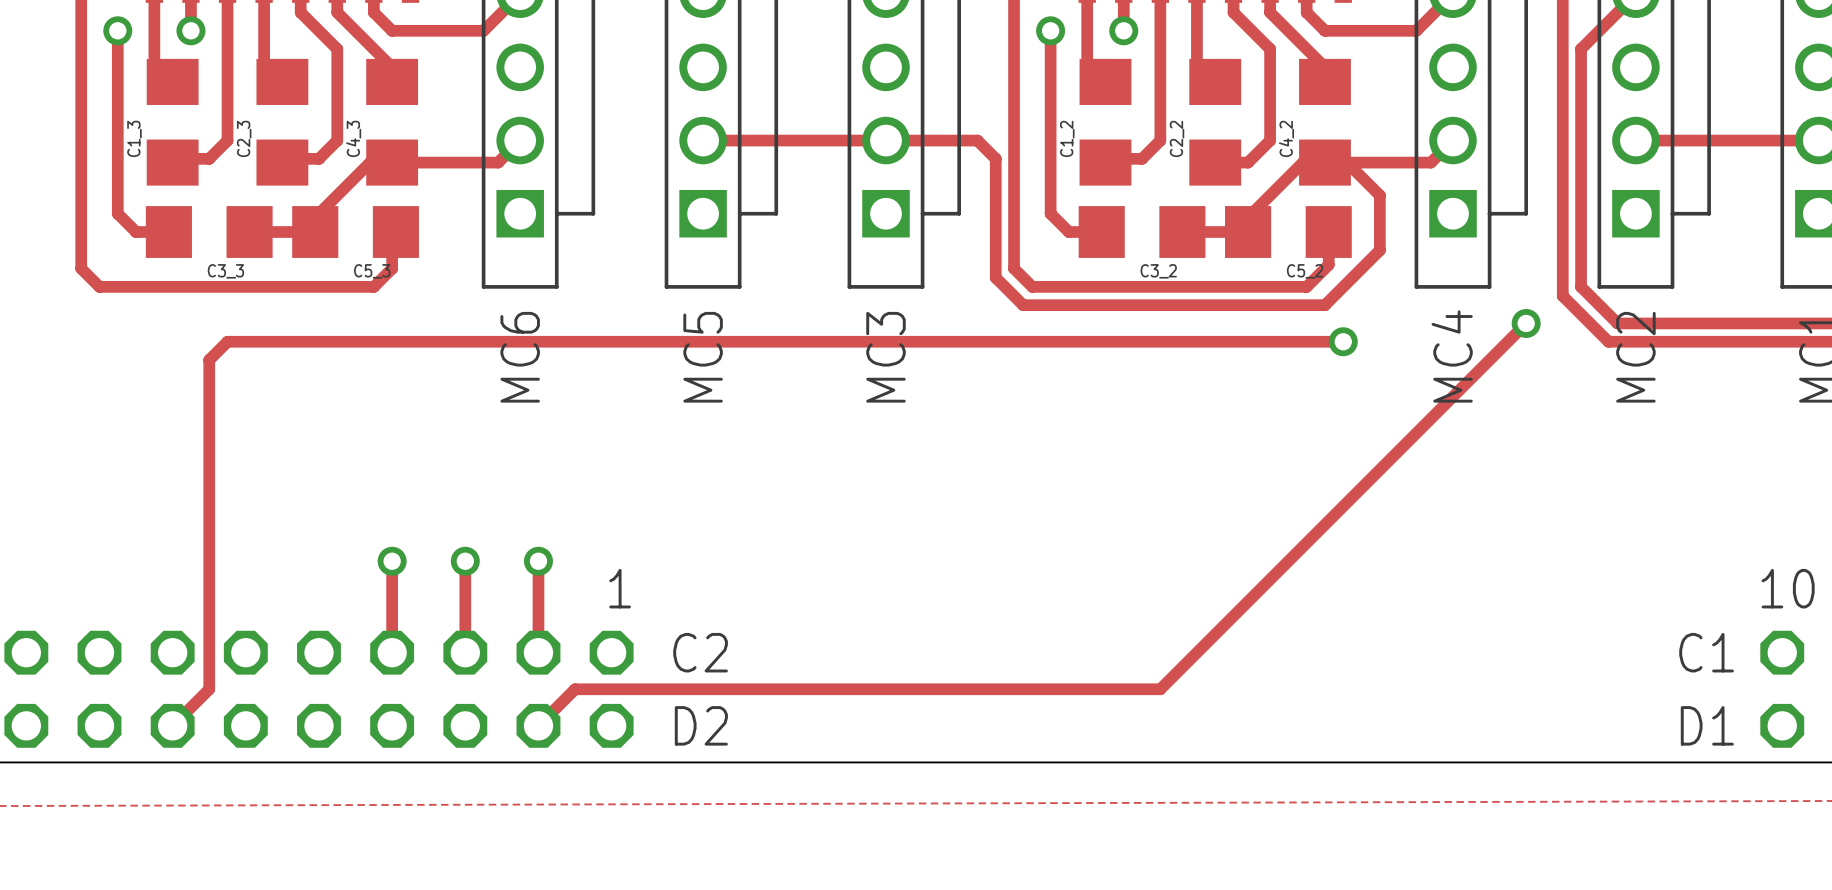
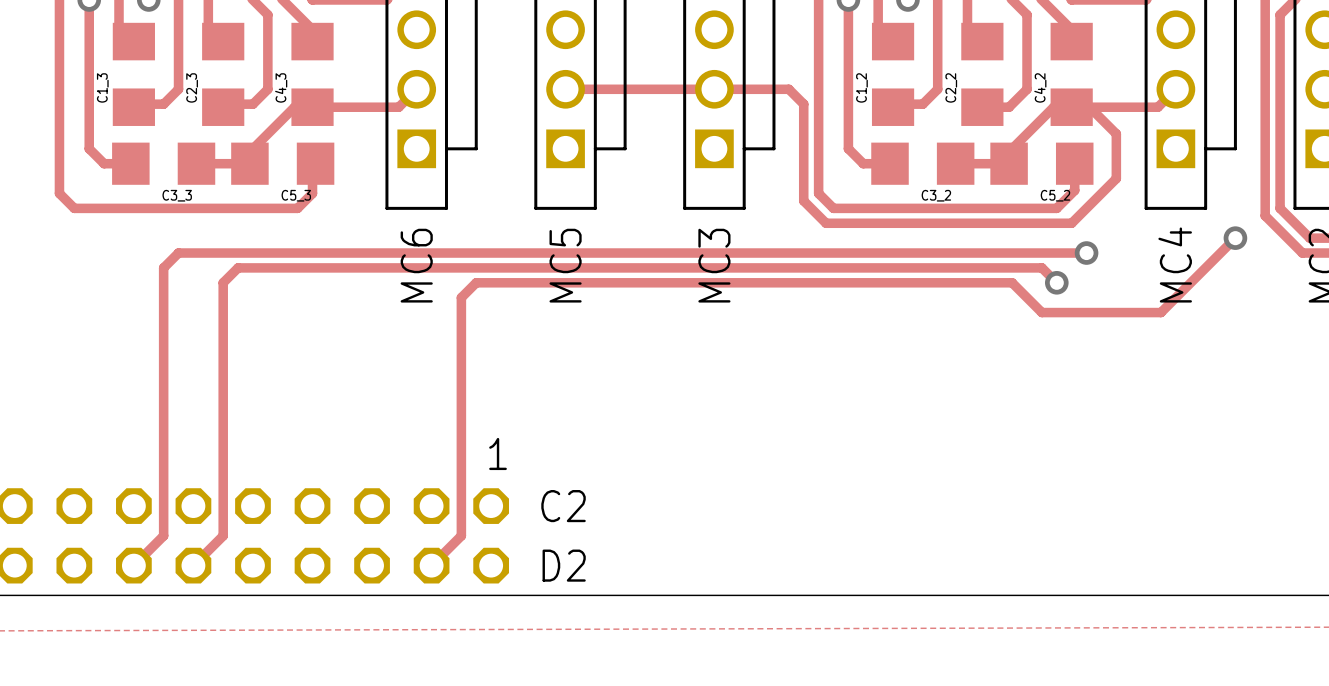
track: none -> (1056, 282) (1041, 267) (238, 267) (223, 282) (223, 535) (193, 565)
via: none -> (1056, 282)
track: (1434, 414) (1160, 689) (575, 689) -> (1160, 312) (1041, 312) (1012, 282) (476, 282) (461, 297) (461, 535)
track: (392, 561) (392, 652) -> none
via: (392, 561) -> none
track: (465, 561) (465, 652) -> none
via: (465, 561) -> none
track: (538, 561) (538, 652) -> none
via: (538, 561) -> none

